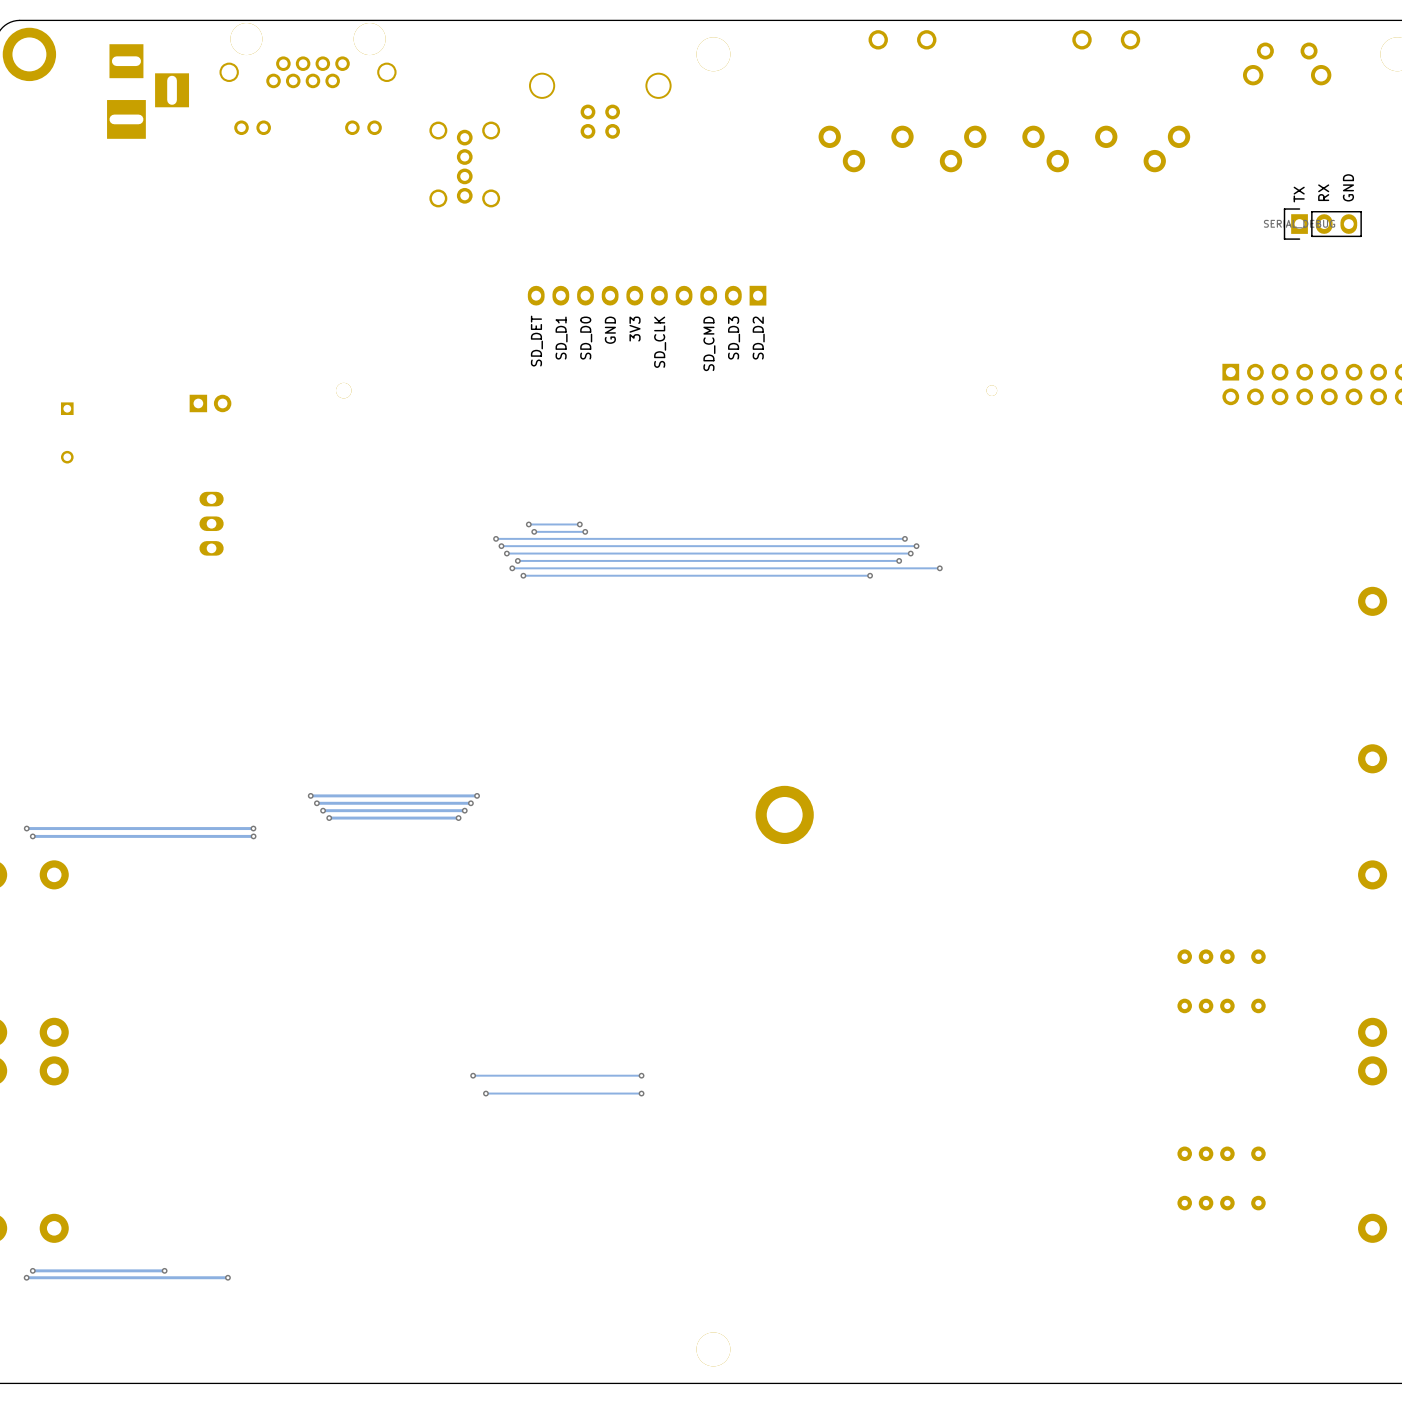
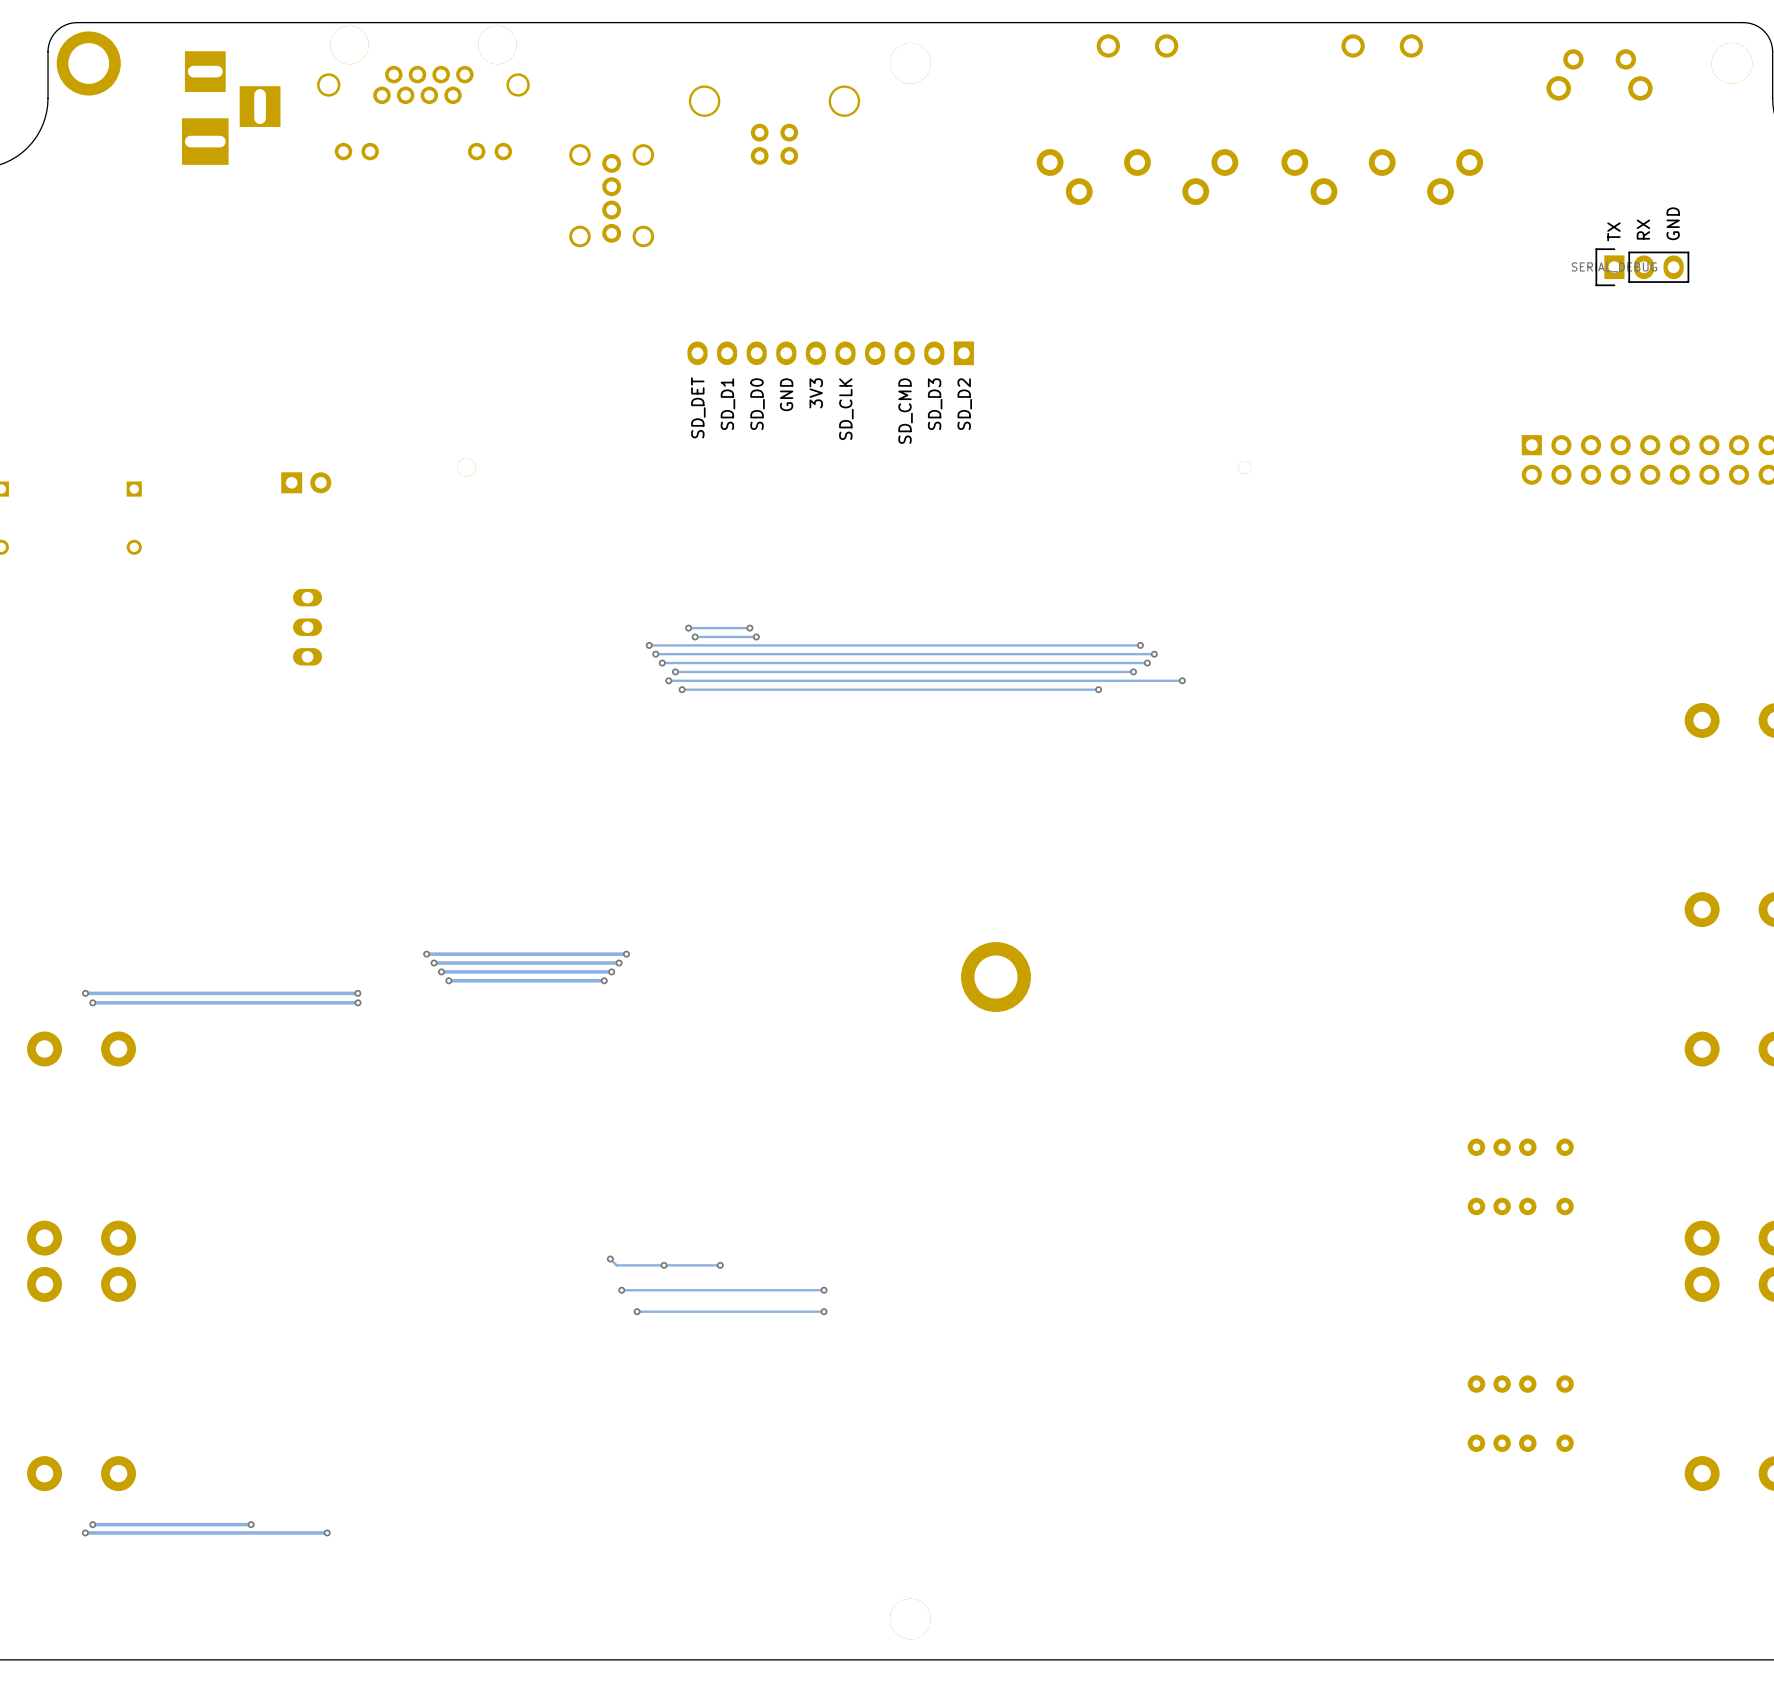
track: none -> (610, 1259) (616, 1265) (720, 1265)
via: none -> (610, 1259)
via: none -> (664, 1265)
via: none -> (720, 1265)

